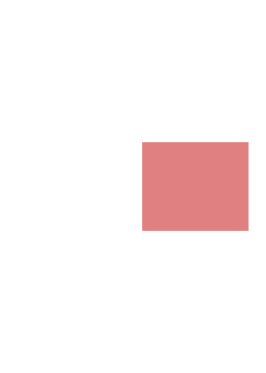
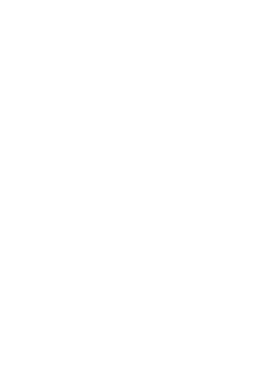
part: (195, 186) -> none

